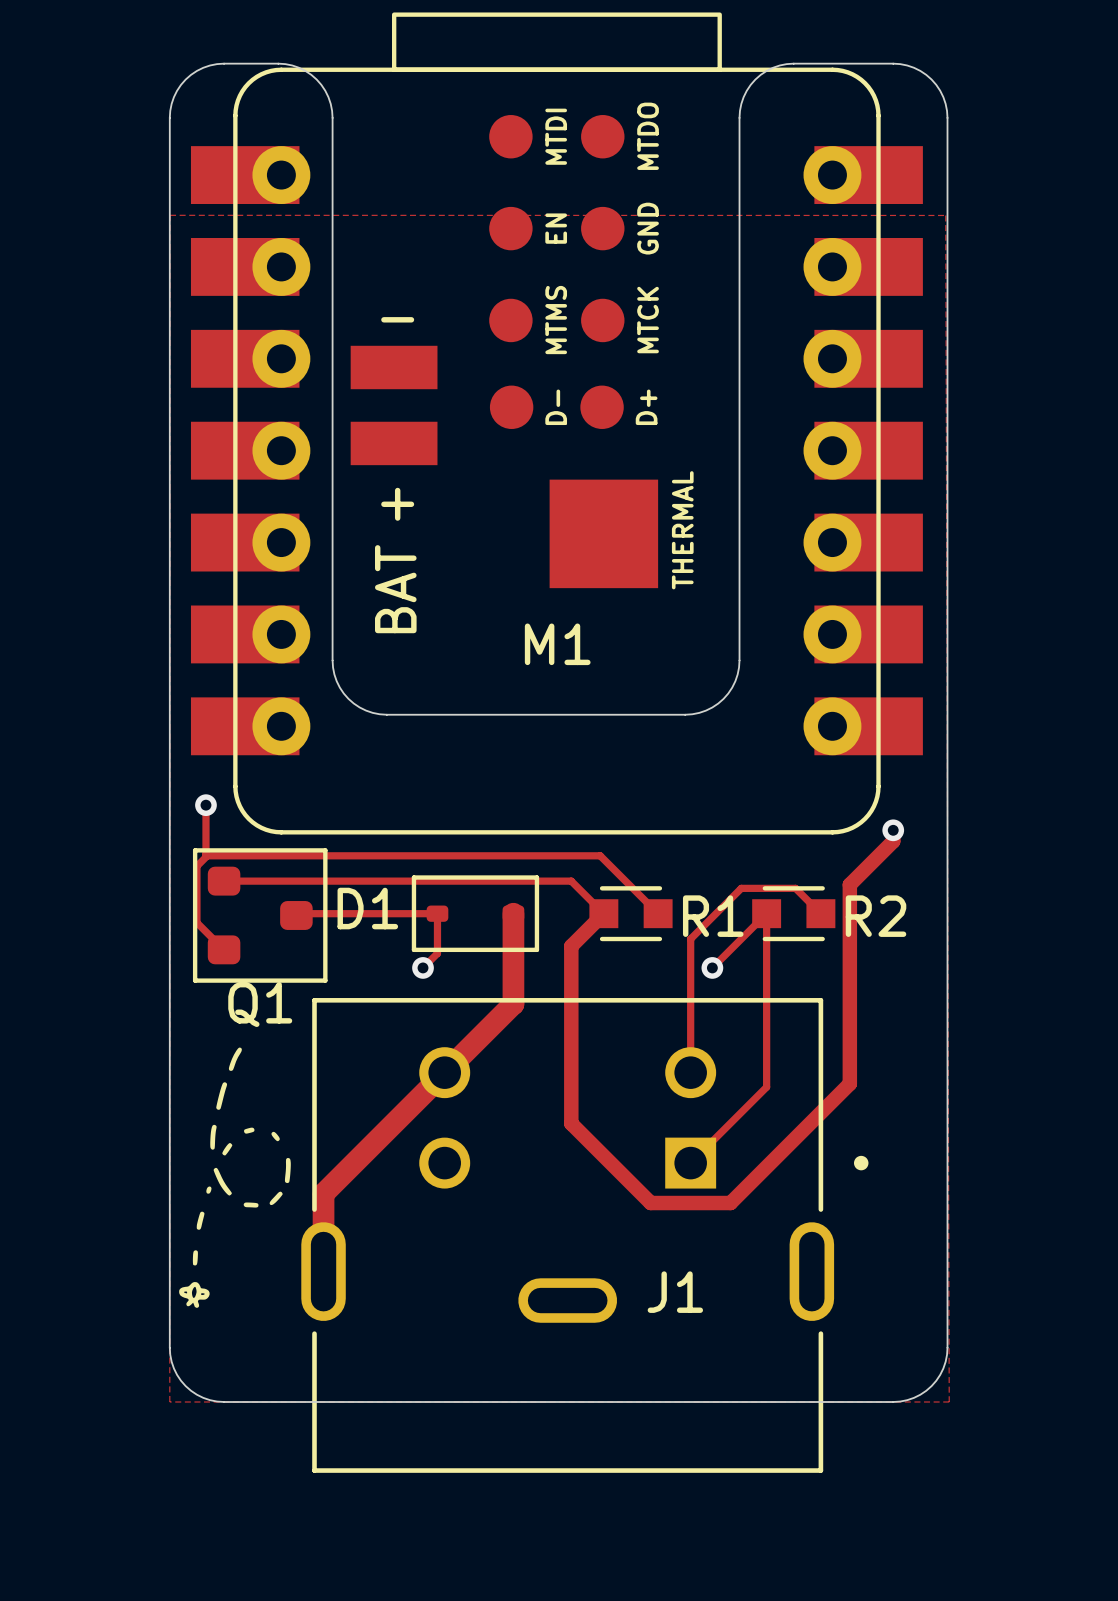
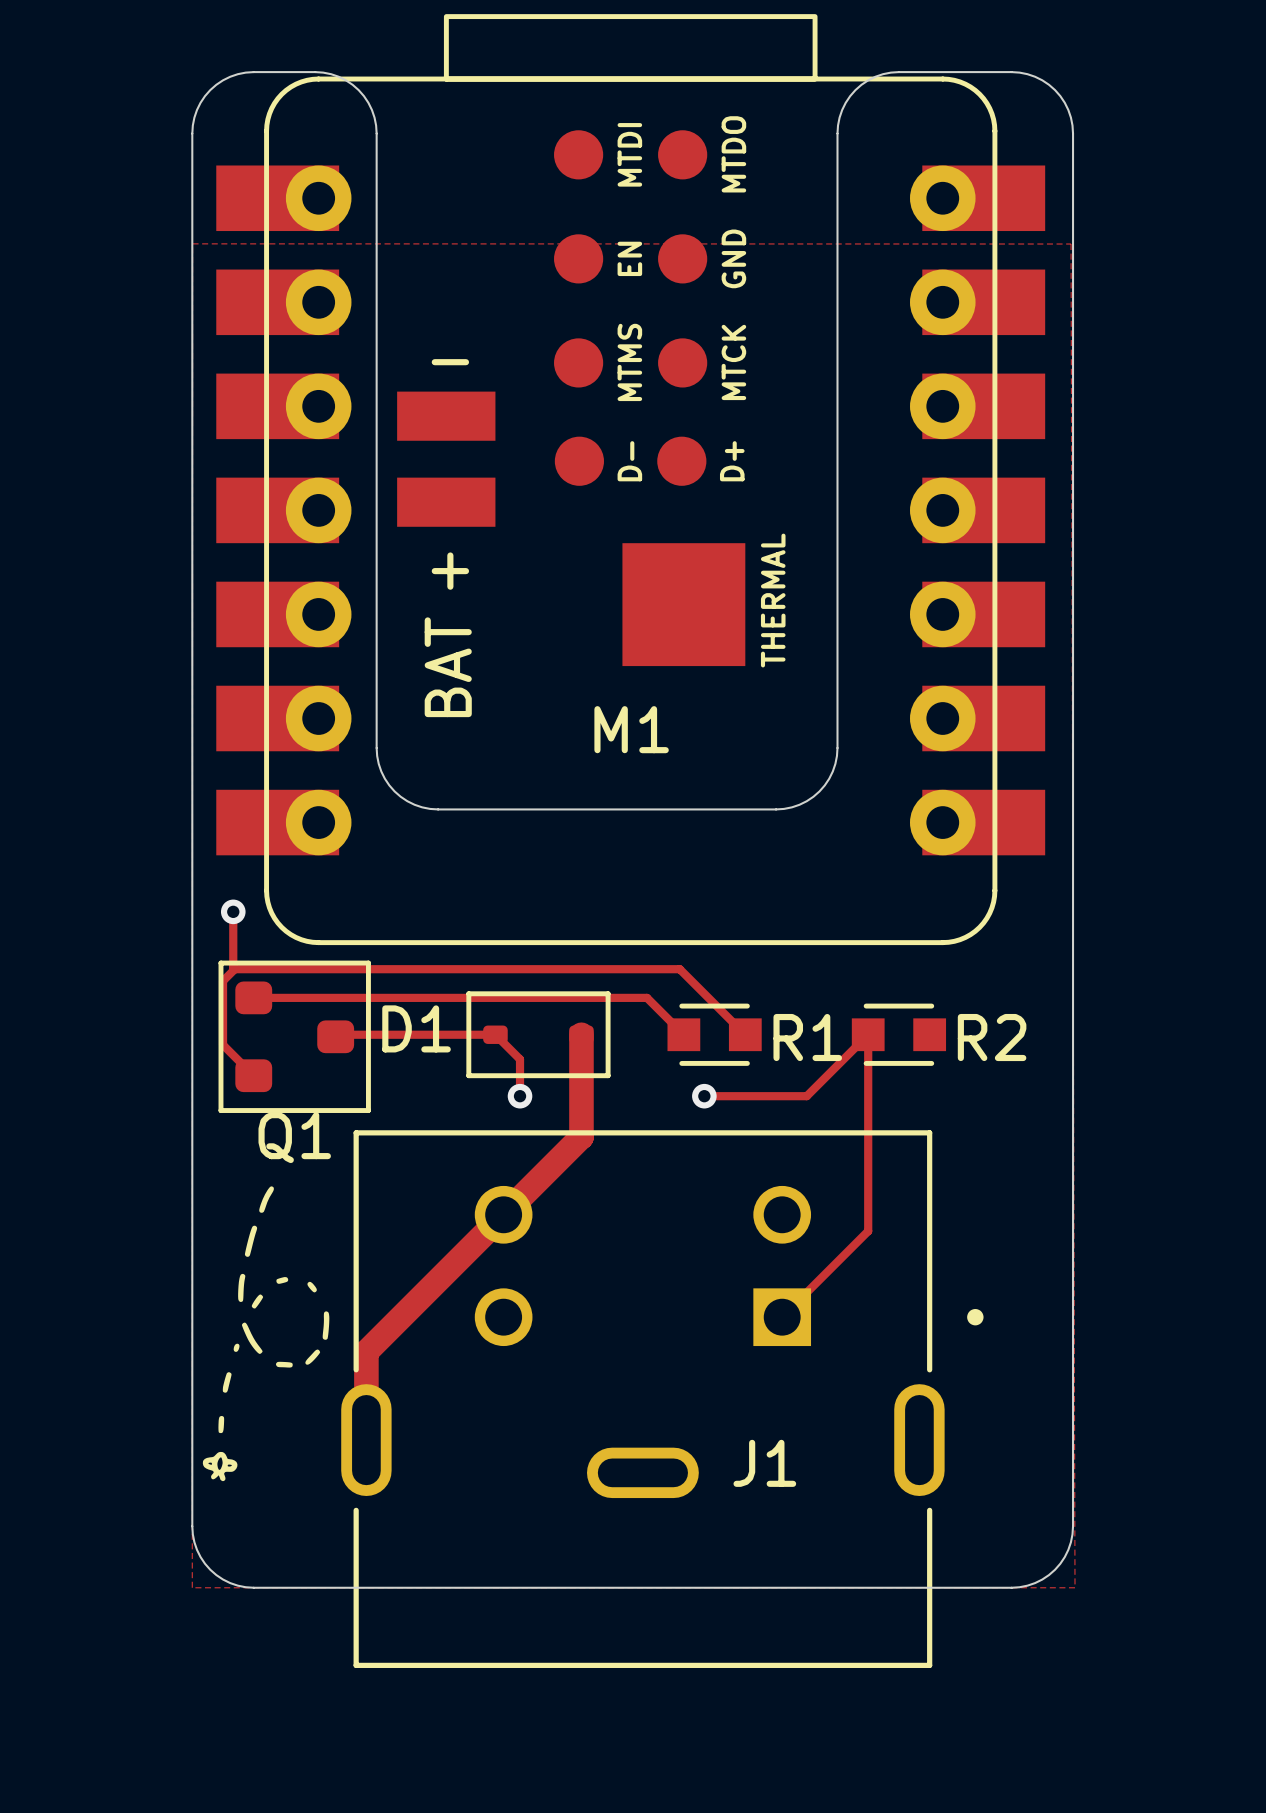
track: (893, 830) (893, 841) (849, 884) (849, 1083) (730, 1203) (650, 1203) (571, 1123) (571, 946) (603, 913) -> none
via: (893, 830) -> none
track: (437, 913) (437, 953) (423, 967) -> (495, 1034) (520, 1059) (520, 1096)
track: (820, 913) (795, 888) (741, 888) (690, 939) (690, 1072) -> none
via position: (423, 967) -> (520, 1096)
track: none -> (704, 1096) (806, 1096)
via position: (712, 967) -> (704, 1096)

